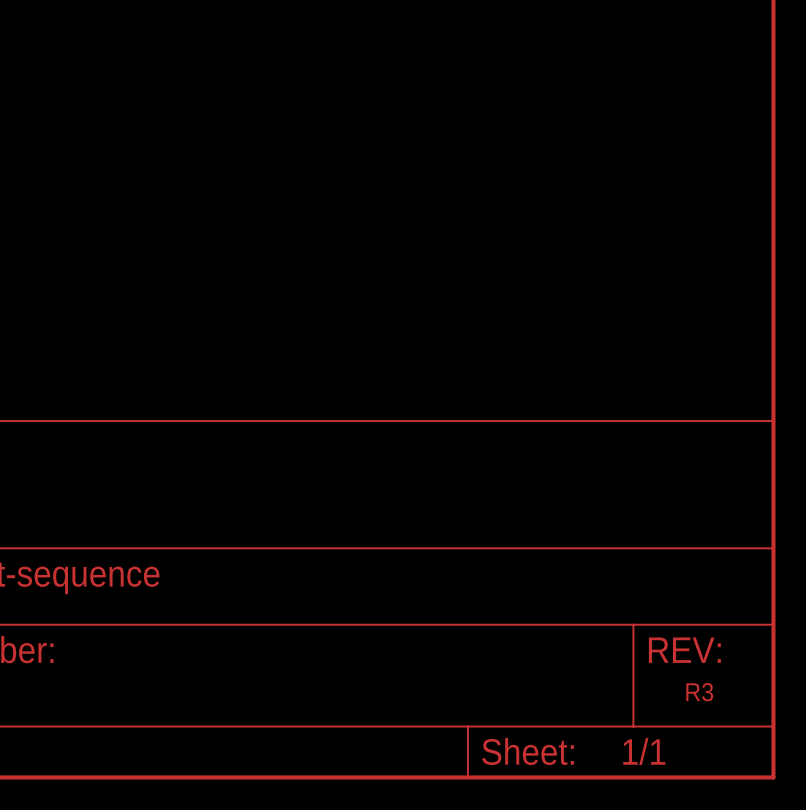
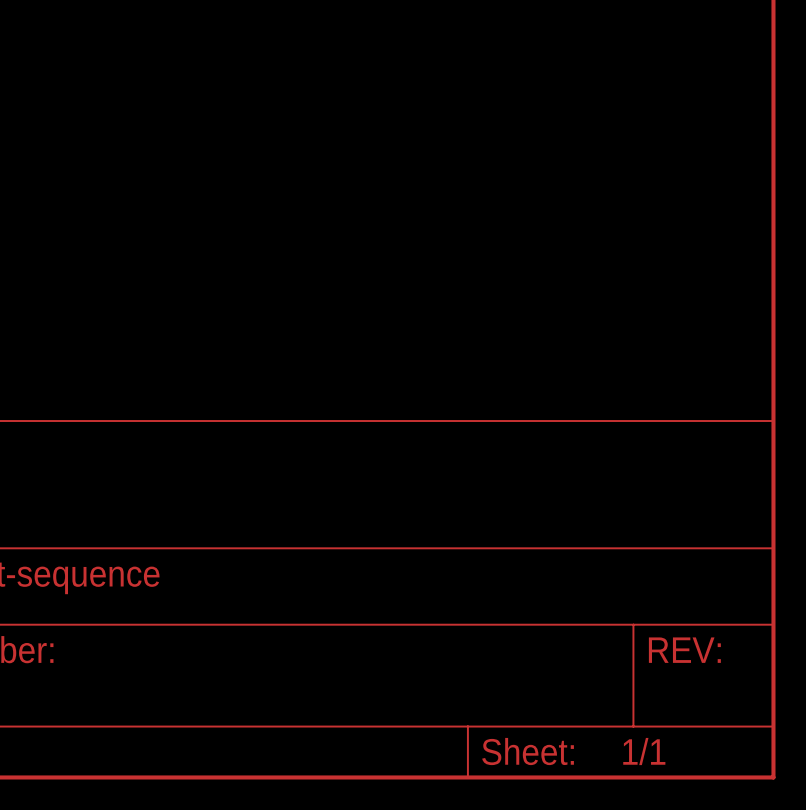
text: R3 (699, 692) -> none

